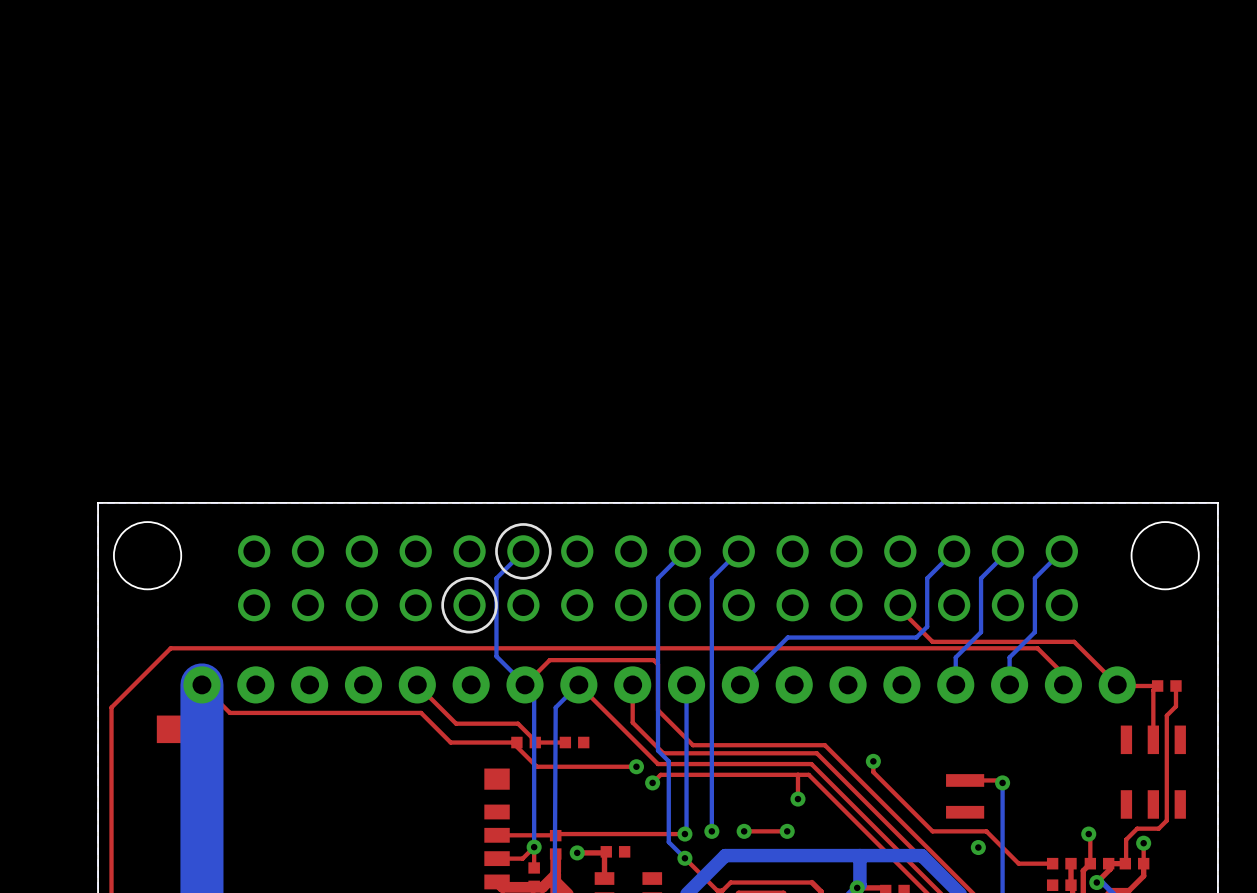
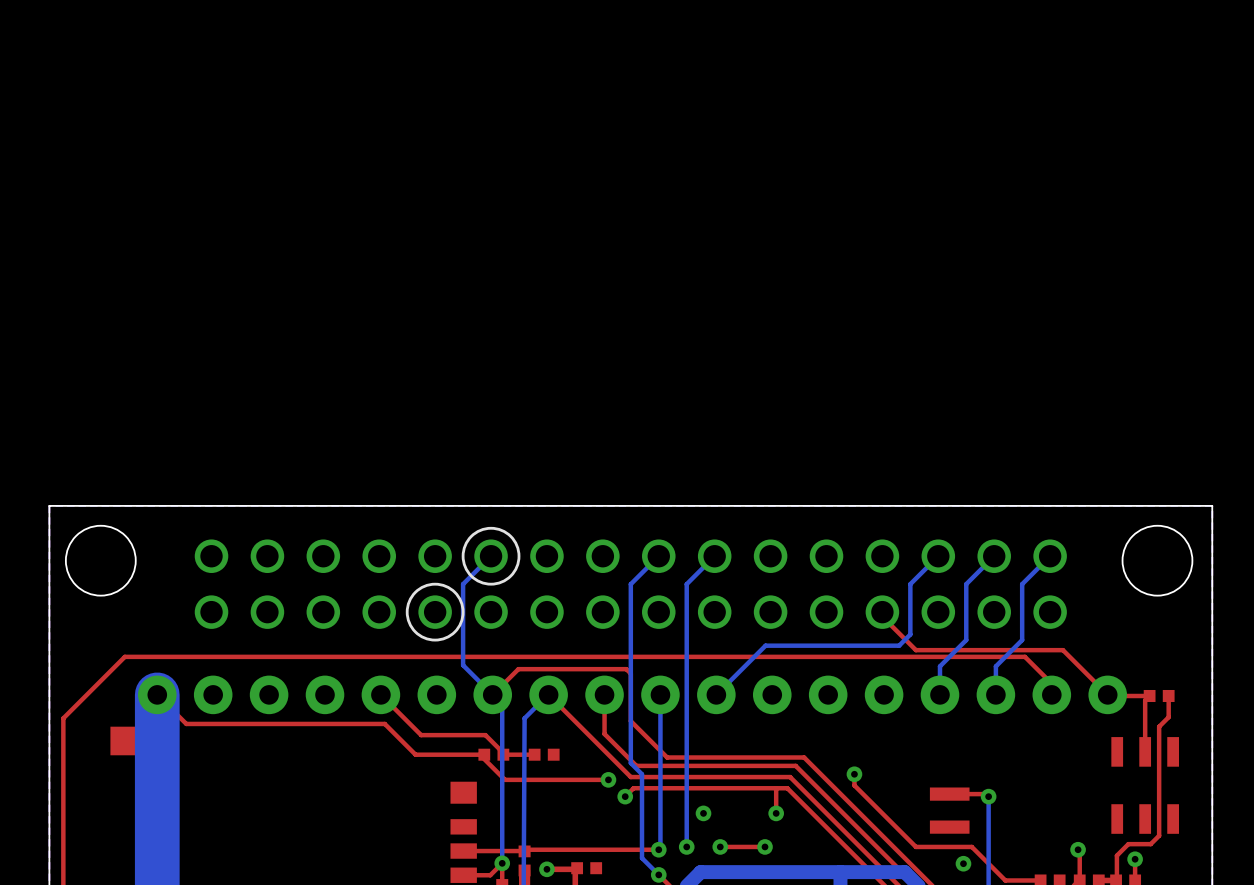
via: none -> (703, 813)

